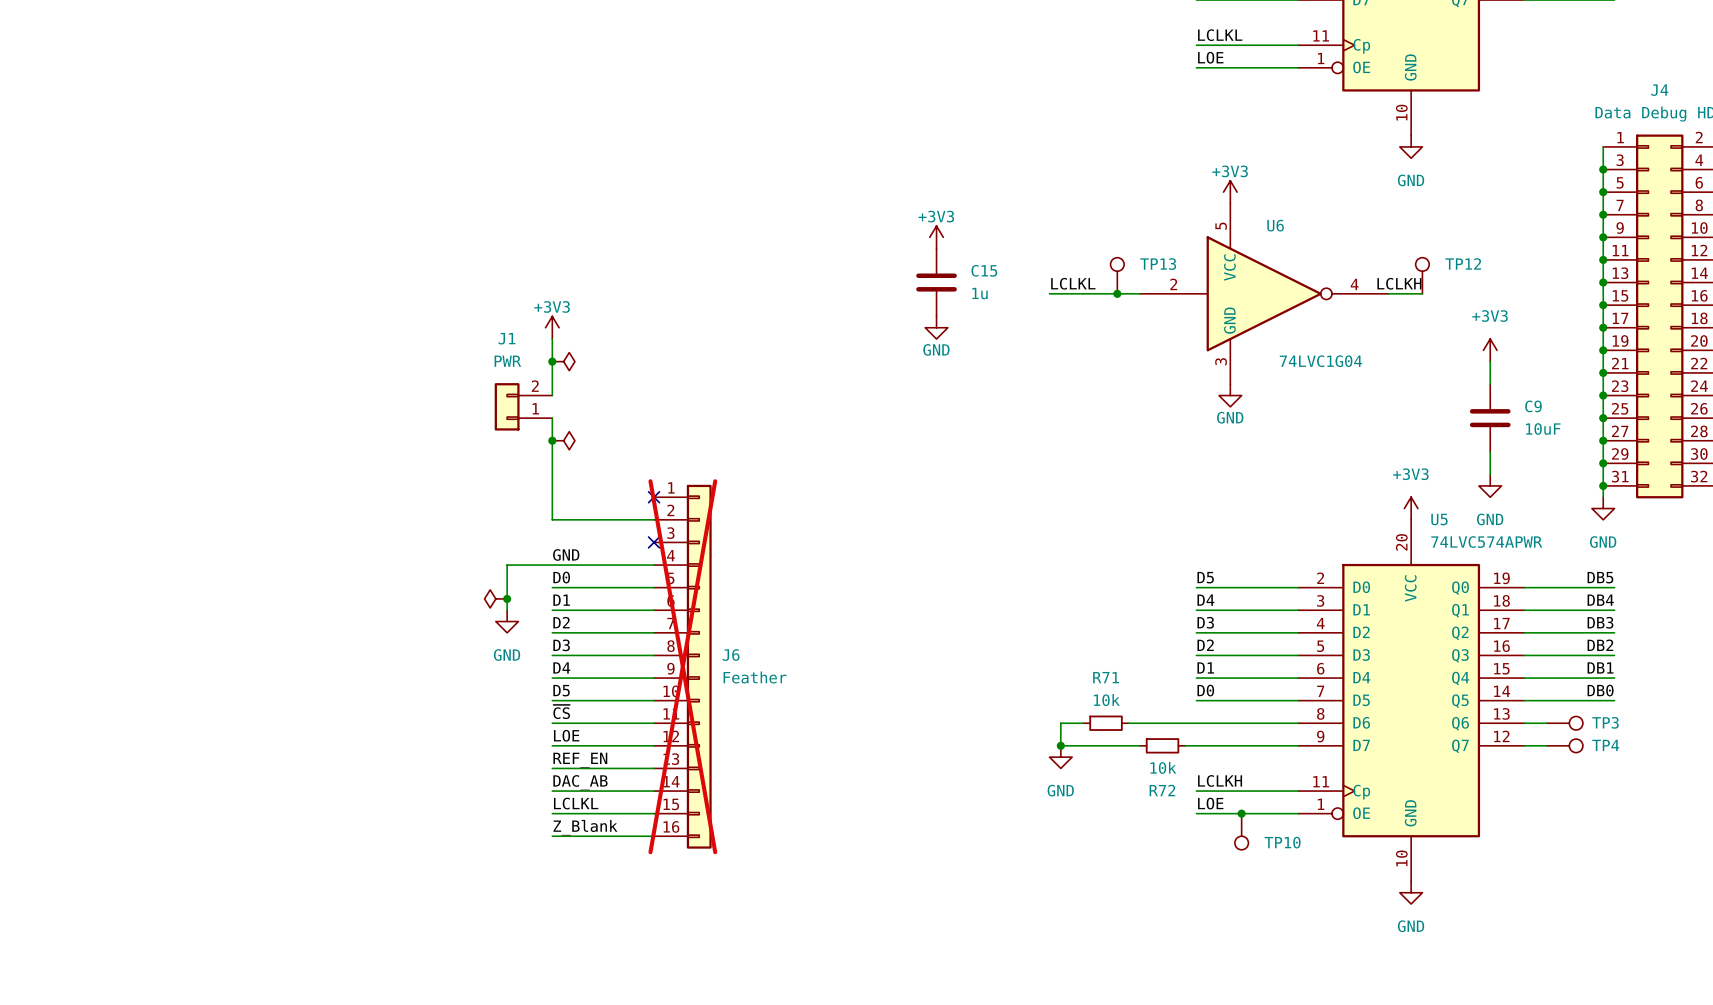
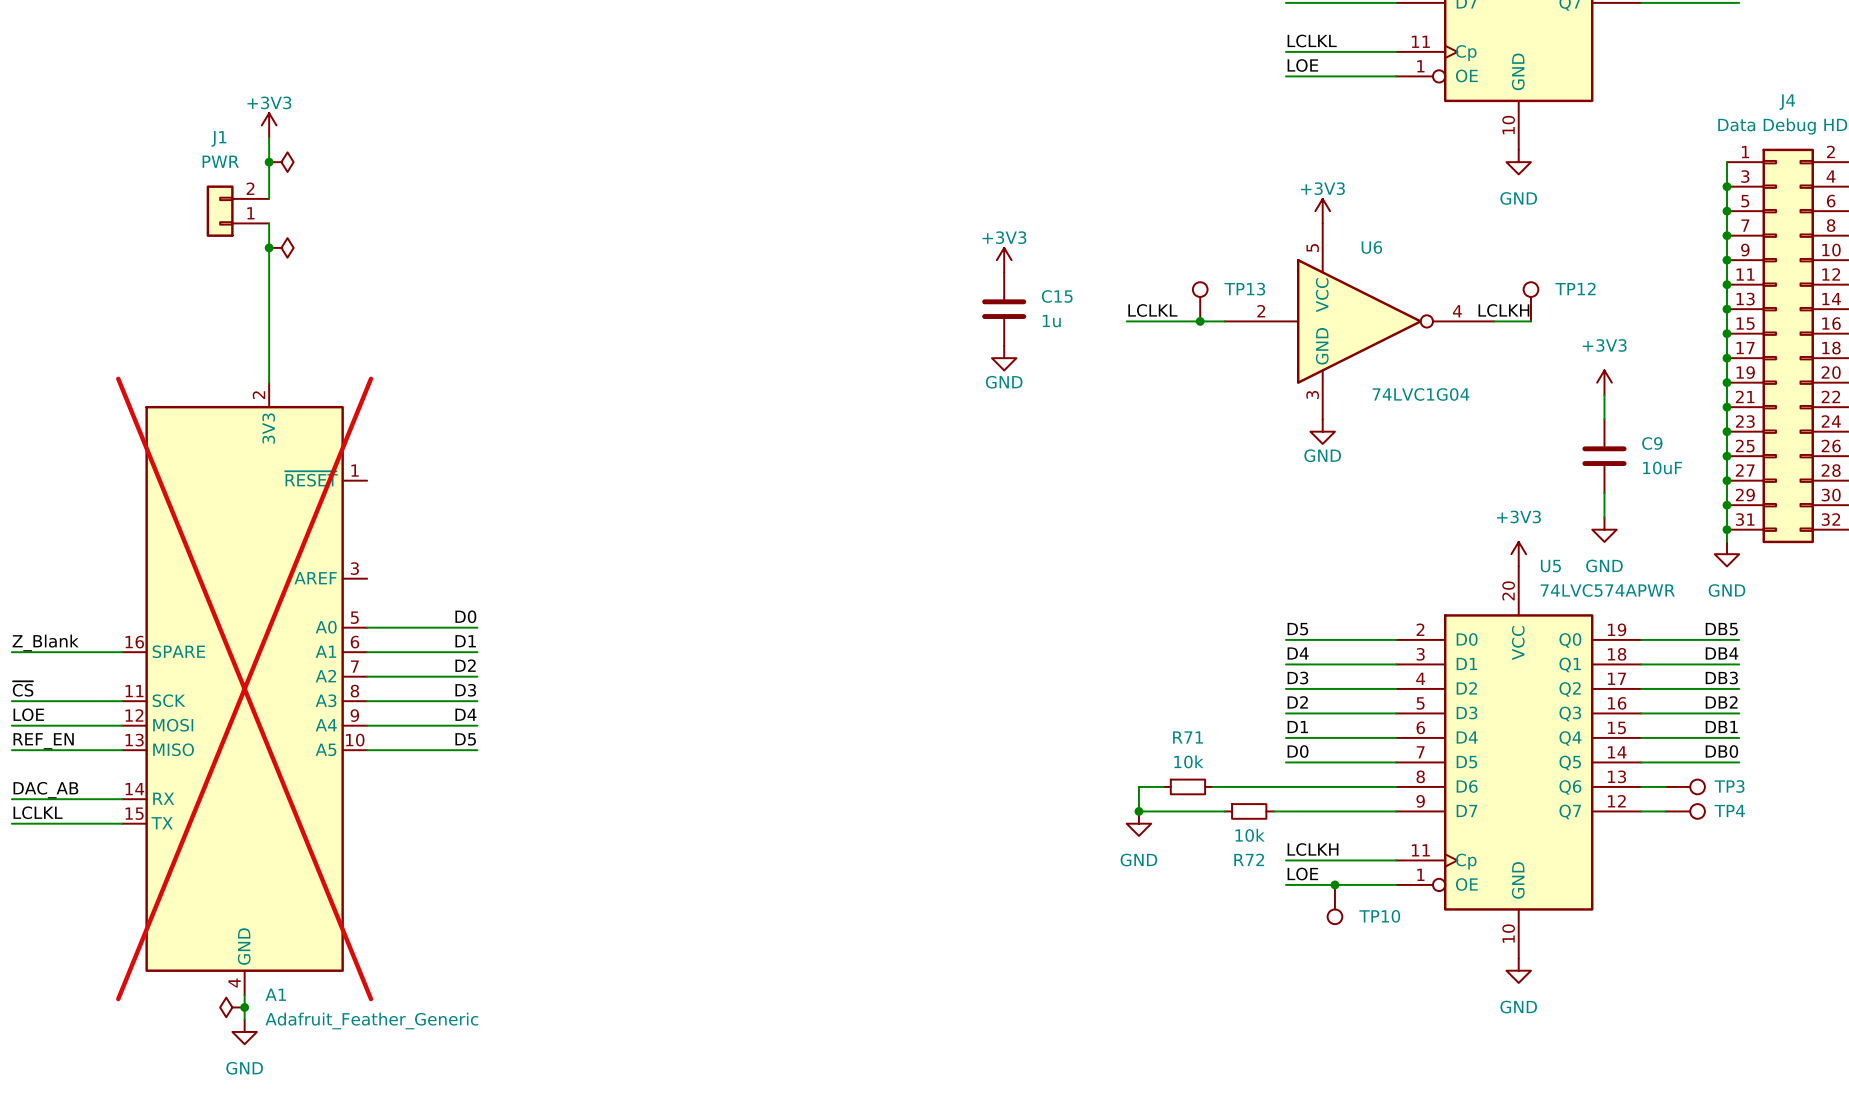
power symbol: none -> +3V3 (269, 125)
wire: none -> (269, 137) (269, 198)
junction: none -> (269, 162)
power symbol: none -> (281, 162)
wire: none -> (269, 223) (269, 382)
junction: none -> (269, 247)
power symbol: none -> (281, 247)
power symbol: +3V3 (552, 327) -> none
wire: (552, 339) (552, 395) -> none
junction: (552, 361) -> none
power symbol: (563, 361) -> none
J1 position: (523, 406) -> (237, 211)
wire: (552, 418) (552, 519) (654, 519) -> none
junction: (552, 440) -> none
power symbol: (563, 440) -> none
no-connect mark: (654, 497) -> none
no-connect mark: (654, 542) -> none
label: GND (566, 554) -> none
wire: (654, 565) (507, 565) (507, 610) -> none
label position: D0 (561, 577) -> D0 (465, 616)
wire: (552, 587) (654, 587) -> (367, 627) (477, 627)
label: none -> Z_Blank (45, 642)
wire: none -> (11, 652) (122, 652)
power symbol: (495, 598) -> none
junction: (507, 598) -> none
label position: D1 (561, 600) -> D1 (465, 641)
wire: (552, 610) (654, 610) -> (367, 652) (477, 652)
power symbol: GND (507, 621) -> none
label position: D2 (561, 622) -> D2 (465, 665)
label: none -> ~{CS} (23, 688)
A1: none -> Adafruit_Feather_Generic (244, 688)
wire: (552, 632) (654, 632) -> (367, 676) (477, 676)
wire: none -> (11, 701) (122, 701)
label position: D3 (561, 645) -> D3 (465, 690)
wire: (552, 655) (654, 655) -> (367, 701) (477, 701)
label: none -> LOE (28, 714)
wire: none -> (11, 725) (122, 725)
J6: Feather (682, 666) -> none
label position: D4 (561, 667) -> D4 (465, 714)
wire: (552, 678) (654, 678) -> (367, 725) (477, 725)
label: none -> REF_EN (43, 741)
wire: none -> (11, 750) (122, 750)
label position: D5 (561, 690) -> D5 (465, 739)
wire: (552, 700) (654, 700) -> (367, 750) (477, 750)
label: ~{CS} (561, 711) -> none
wire: (552, 723) (654, 723) -> none
label: none -> DAC_AB (45, 790)
wire: none -> (11, 799) (122, 799)
label: LOE (566, 735) -> none
wire: (552, 745) (654, 745) -> none
label: none -> LCLKL (38, 812)
wire: none -> (11, 823) (122, 823)
label: REF_EN (580, 760) -> none
wire: (552, 768) (654, 768) -> none
label: DAC_AB (580, 782) -> none
wire: (552, 791) (654, 791) -> none
label: LCLKL (576, 803) -> none
wire: (552, 813) (654, 813) -> none
label: Z_Blank (585, 827) -> none
wire: (552, 836) (654, 836) -> none
wire: none -> (244, 995) (244, 1019)
power symbol: none -> (232, 1007)
junction: none -> (244, 1007)
power symbol: none -> GND (244, 1031)

